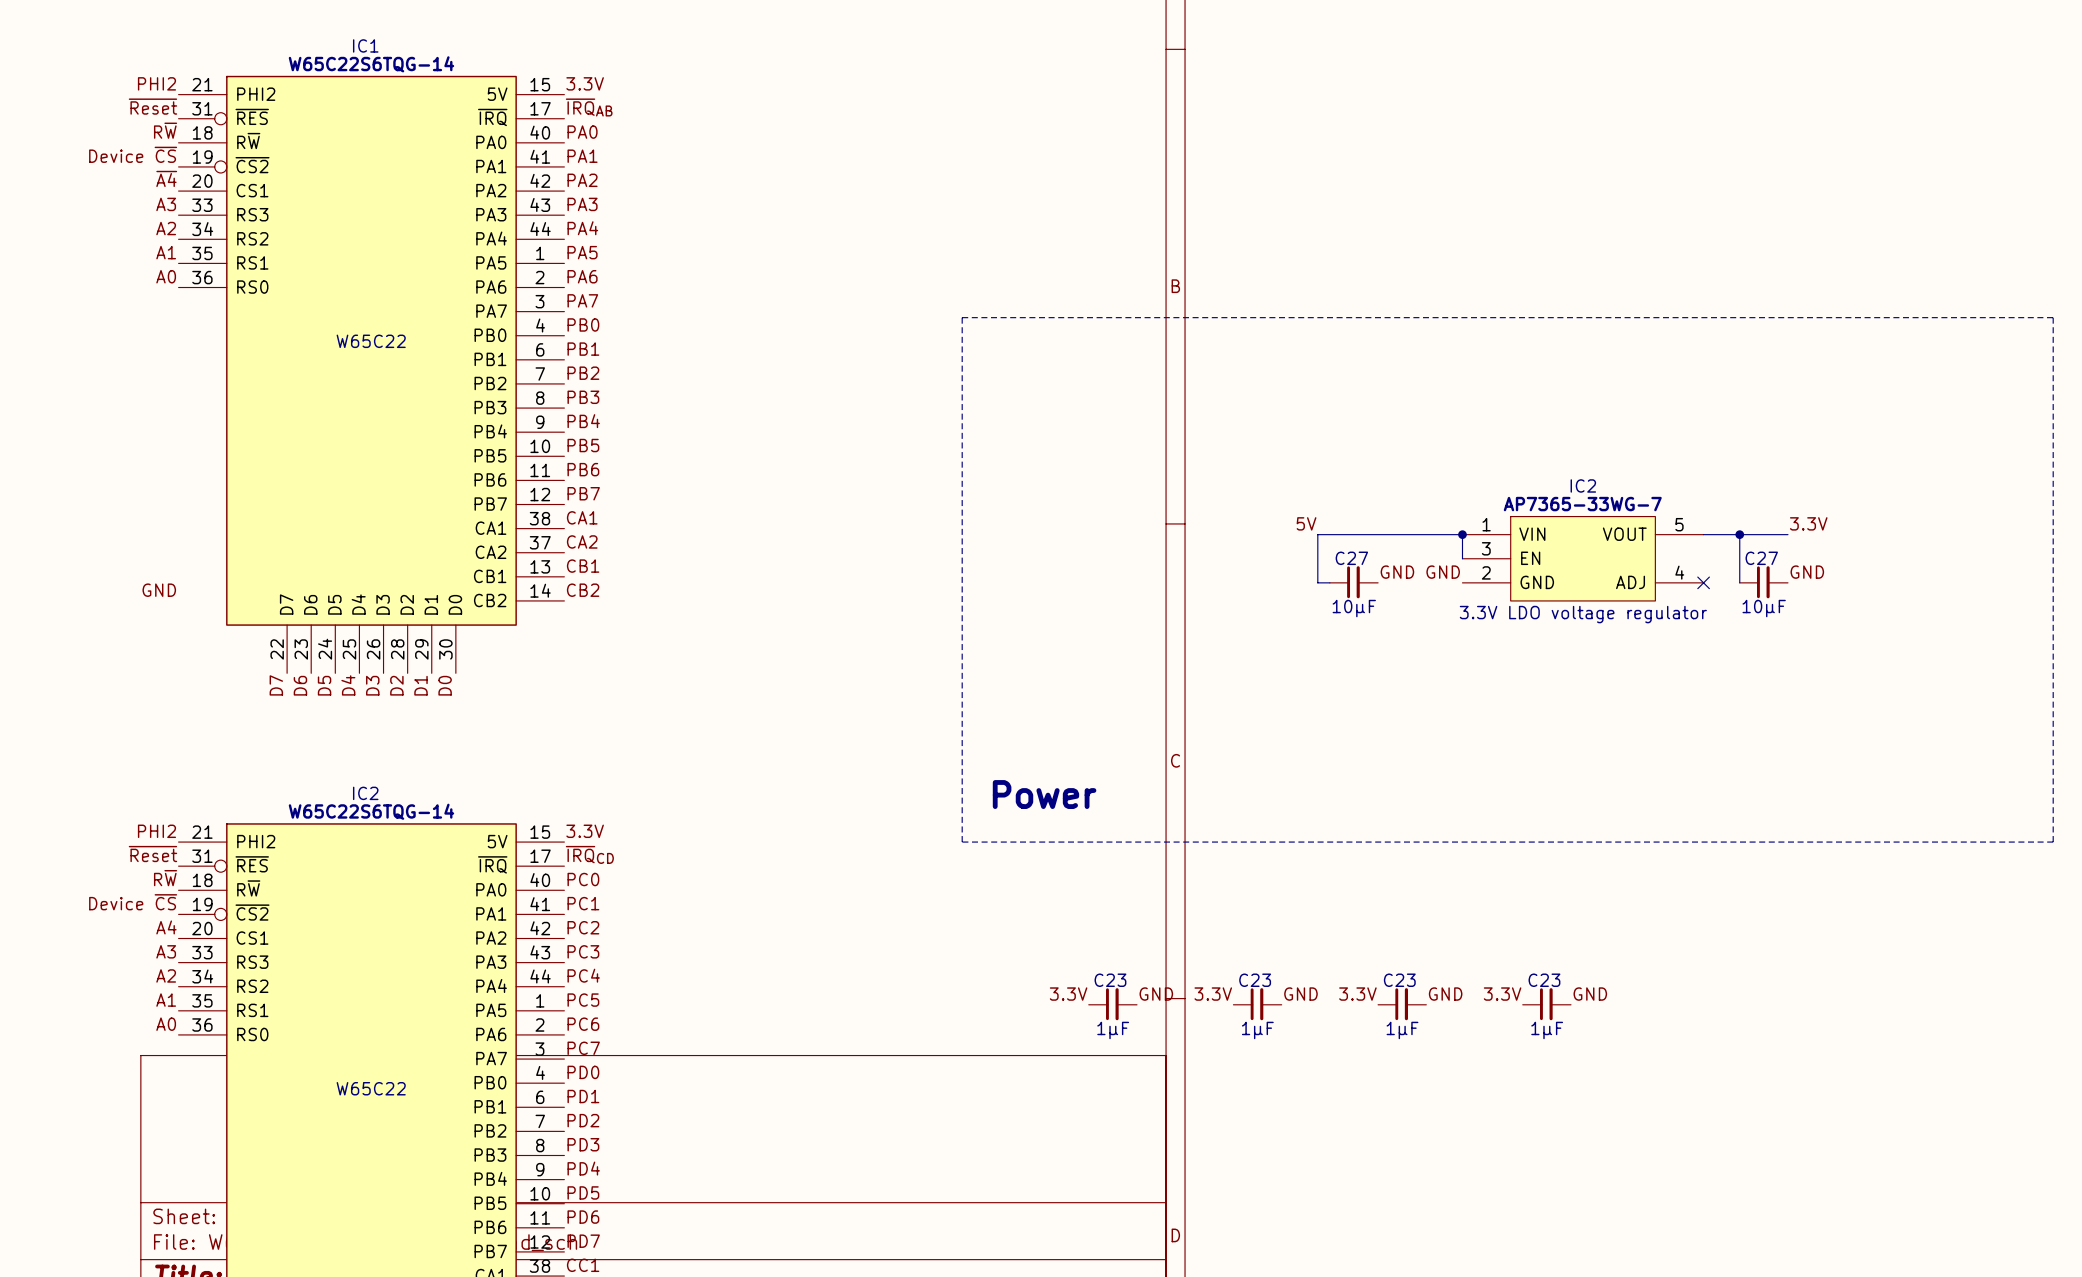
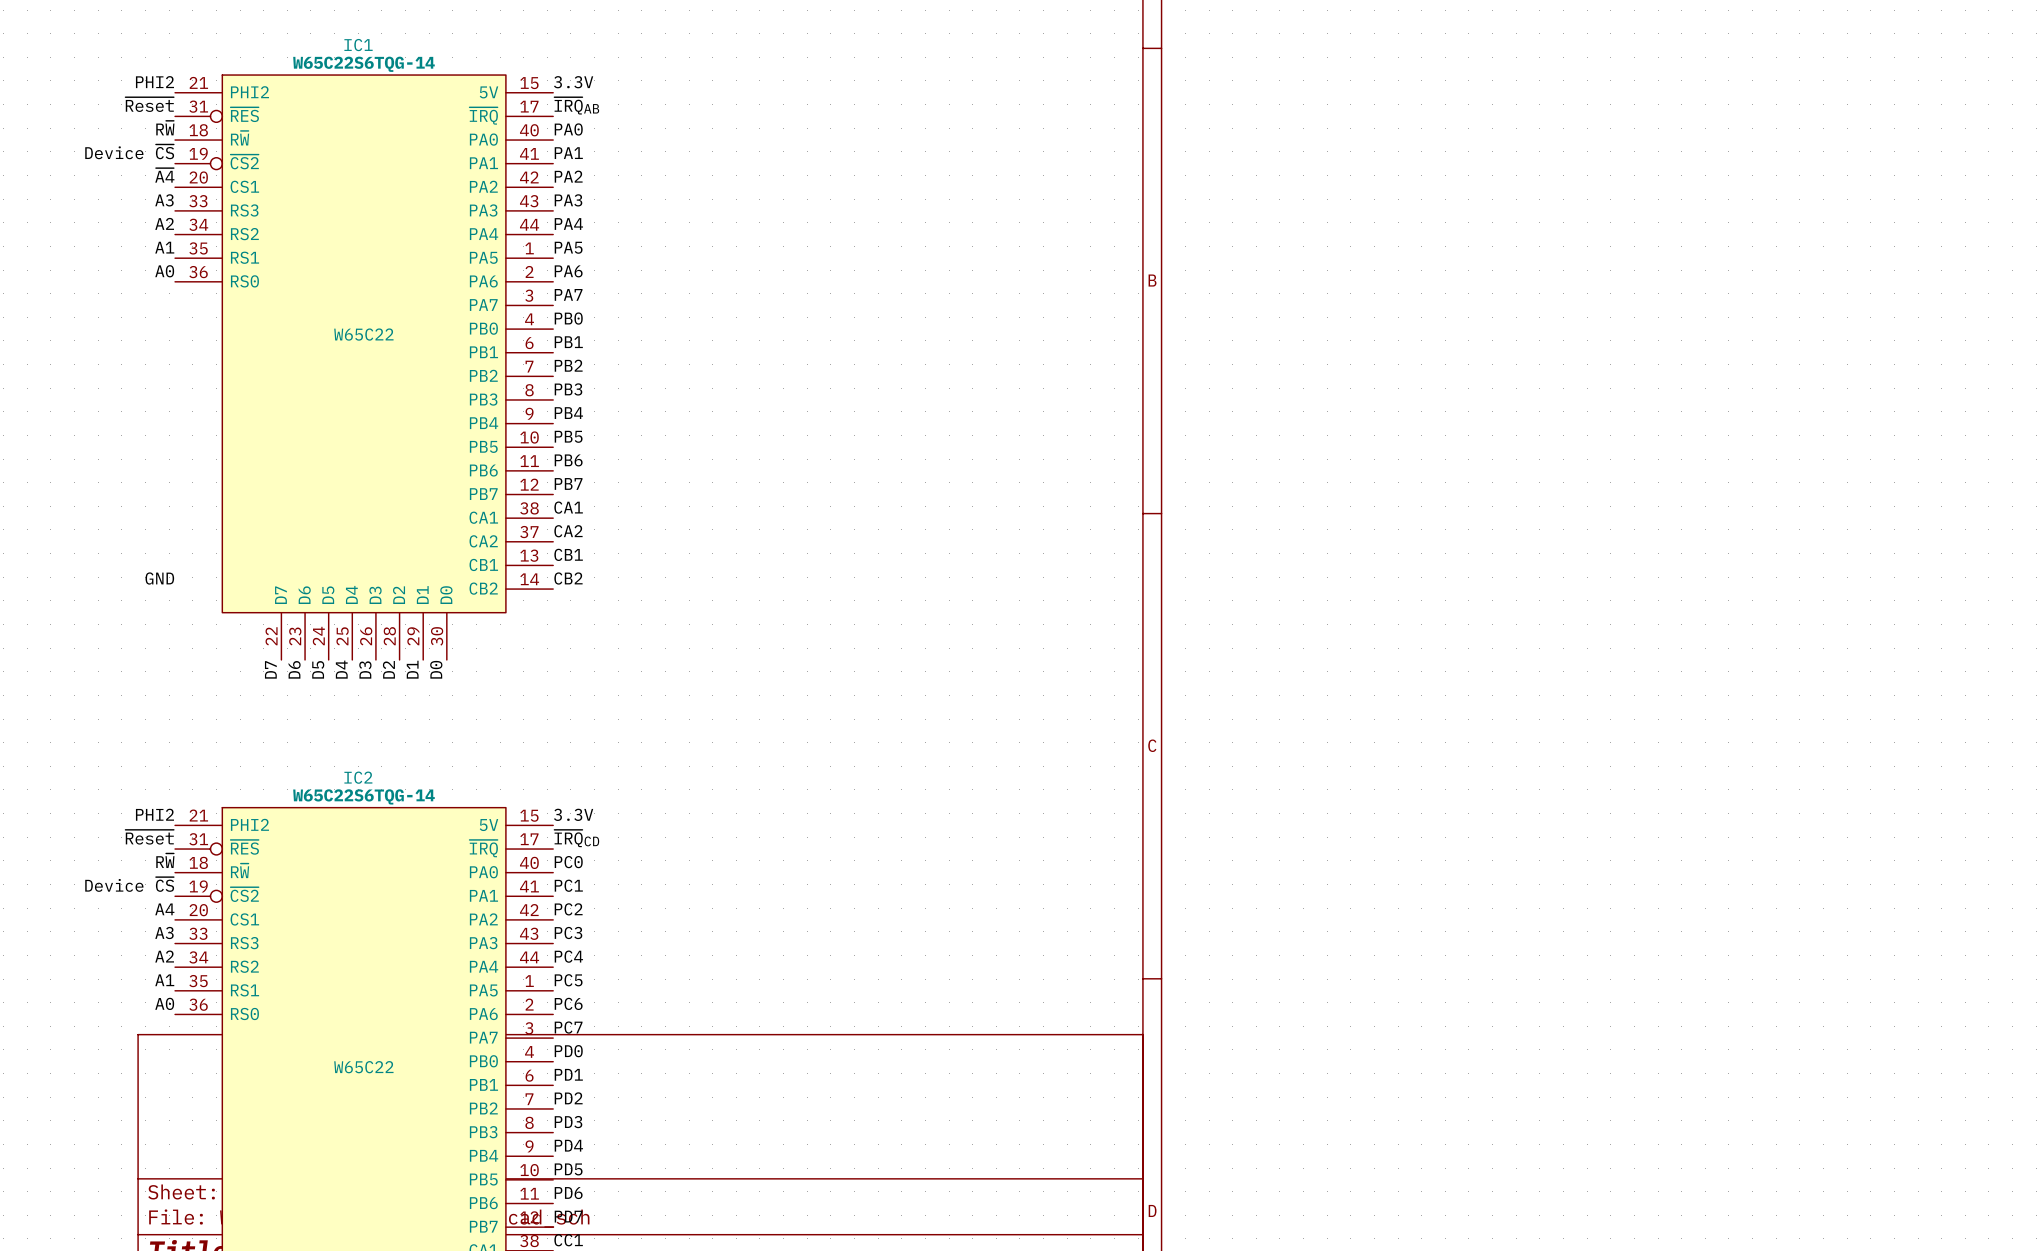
line: (962, 317) (2053, 317) (2053, 842) (962, 842) (962, 317) -> none
label: 5V (1306, 523) -> none
label: 3.3V (1808, 523) -> none
junction: (1462, 534) -> none
wire: (1703, 534) (1787, 534) -> none
wire: (1739, 534) (1739, 582) -> none
junction: (1739, 534) -> none
wire: (1462, 558) (1462, 534) (1317, 534) (1317, 582) (1329, 582) -> none
IC2: AP7365-33WG-7 (1583, 558) -> none
label: GND (1397, 572) -> none
label: GND (1443, 572) -> none
label: GND (1807, 572) -> none
C27: 10μF (1353, 582) -> none
no-connect mark: (1703, 582) -> none
C27: 10μF (1763, 582) -> none
text: Power (1044, 794) -> none
label: 3.3V (1068, 994) -> none
label: GND (1156, 994) -> none
label: 3.3V (1213, 994) -> none
label: GND (1300, 994) -> none
label: 3.3V (1357, 994) -> none
label: GND (1445, 994) -> none
label: 3.3V (1502, 994) -> none
label: GND (1590, 994) -> none
C23: 1μF (1112, 1004) -> none
C23: 1μF (1257, 1004) -> none
C23: 1μF (1402, 1004) -> none
C23: 1μF (1546, 1004) -> none

